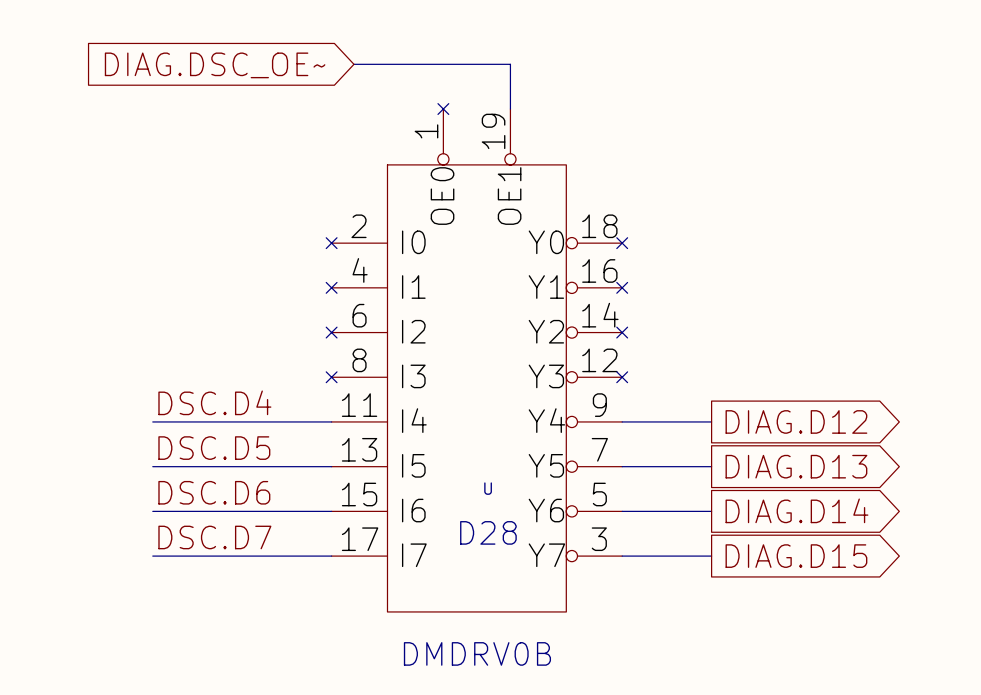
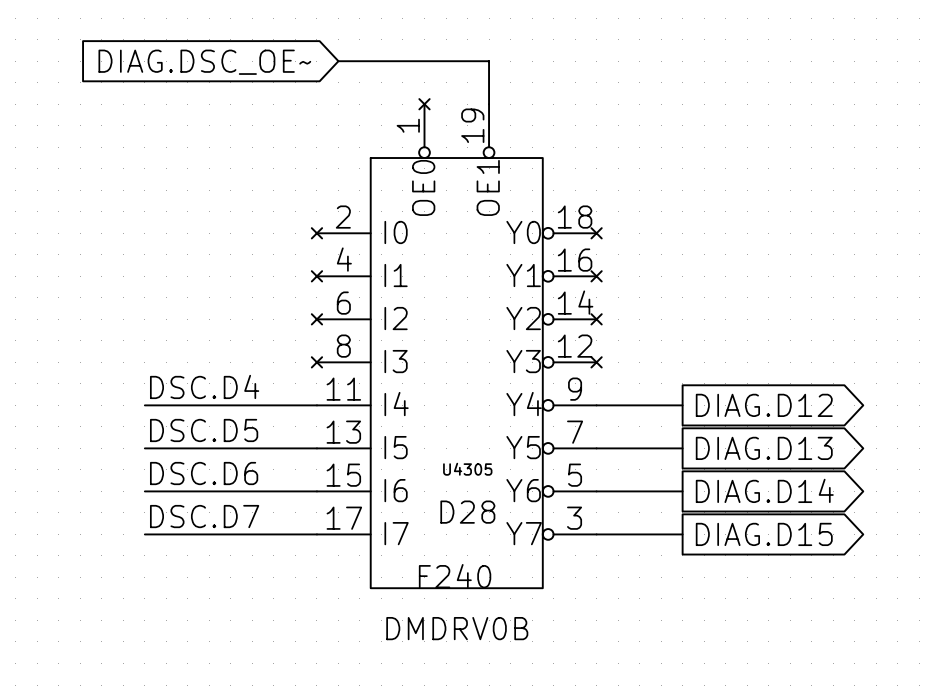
U name: U (488, 488) -> U4305 (467, 469)
U value: none -> F240 (455, 576)

